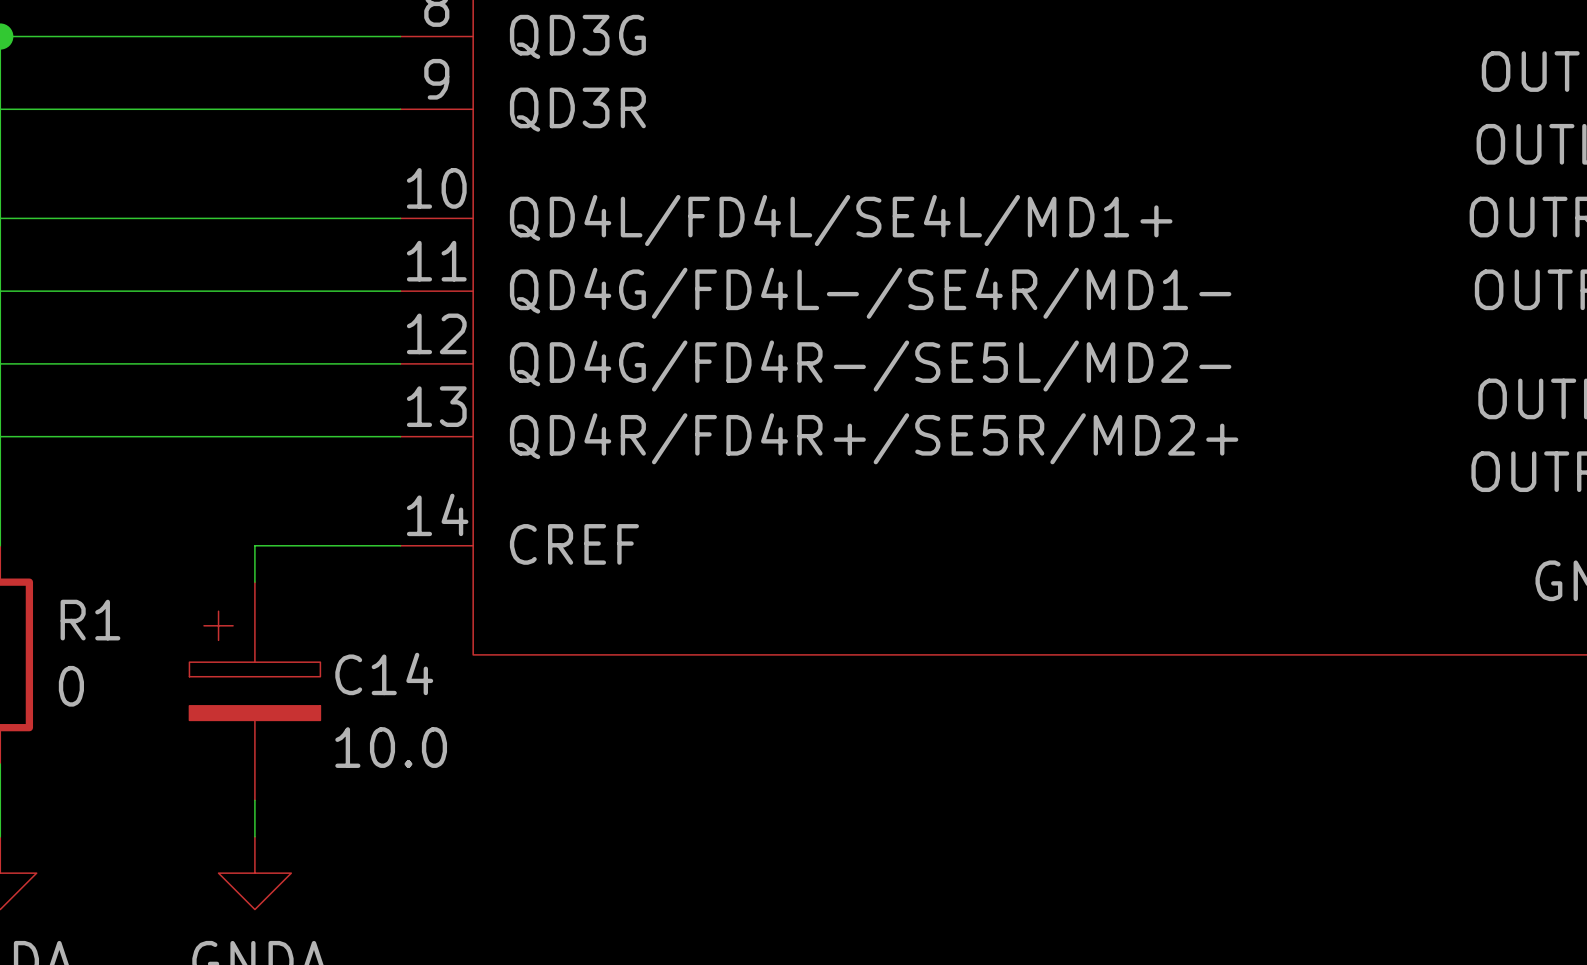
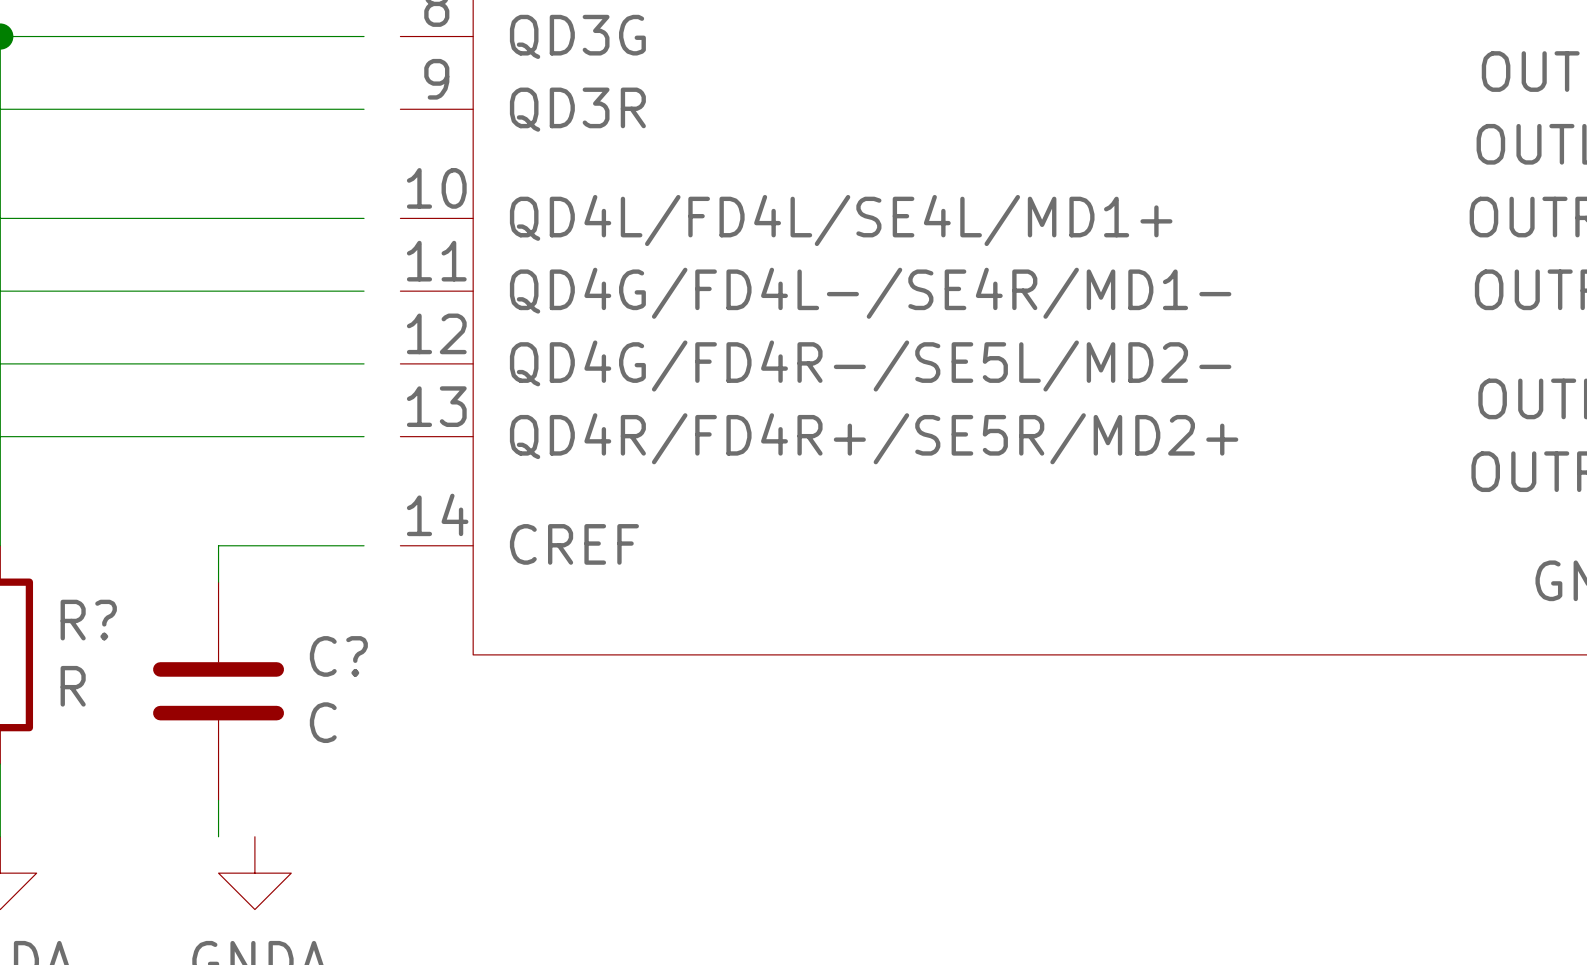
wire: (364, 36) (400, 36) -> none
wire: (364, 109) (400, 109) -> none
wire: (364, 218) (400, 218) -> none
wire: (364, 291) (400, 291) -> none
wire: (364, 363) (400, 363) -> none
wire: (364, 436) (400, 436) -> none
wire: (254, 545) (254, 582) -> (254, 545) (218, 545) (218, 582)
wire: (364, 545) (400, 545) -> none
R1 name: R1 (90, 620) -> R? (88, 620)
R1 value: 0 (71, 686) -> R (73, 686)
C?: none -> C (218, 691)
C14: 10.0 (254, 691) -> none
wire: (254, 800) (254, 836) -> (218, 800) (218, 836)

